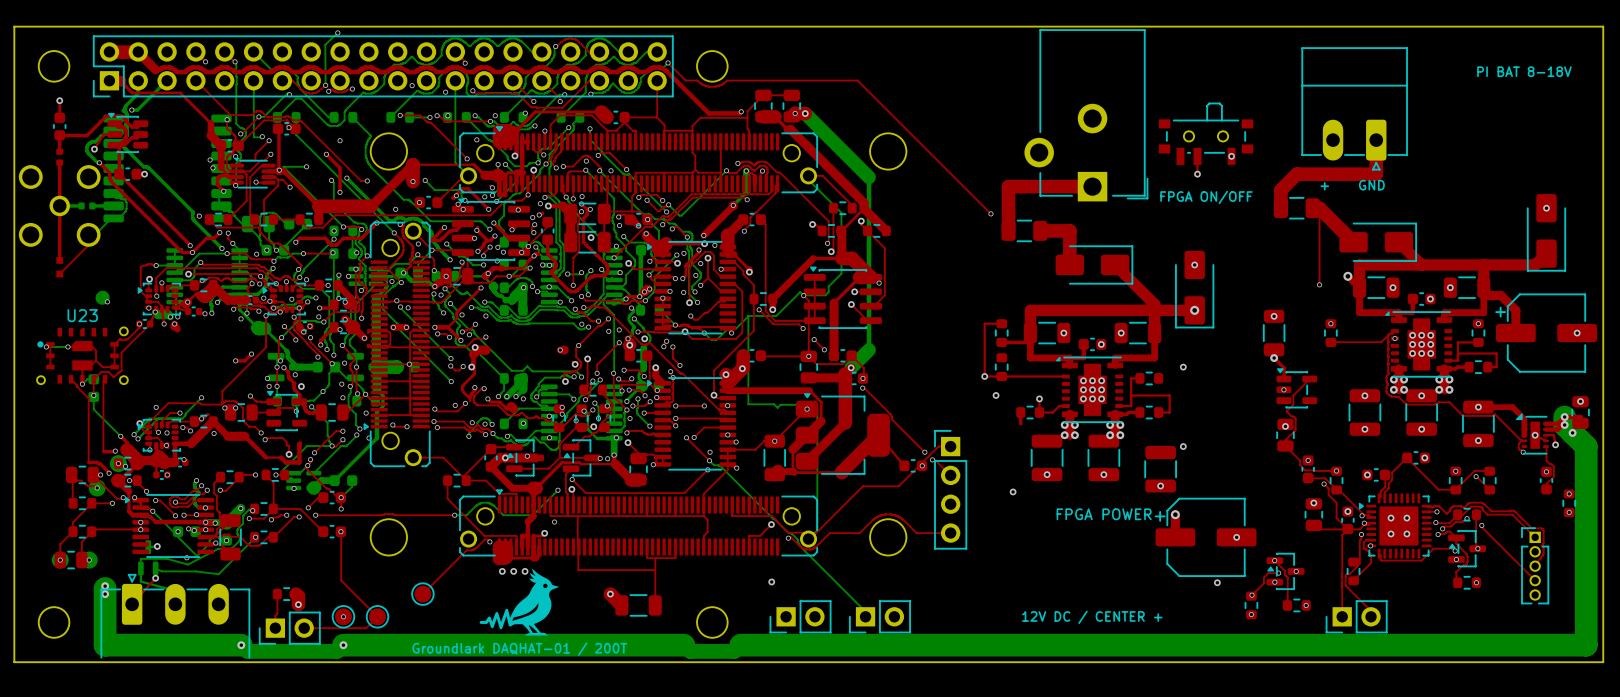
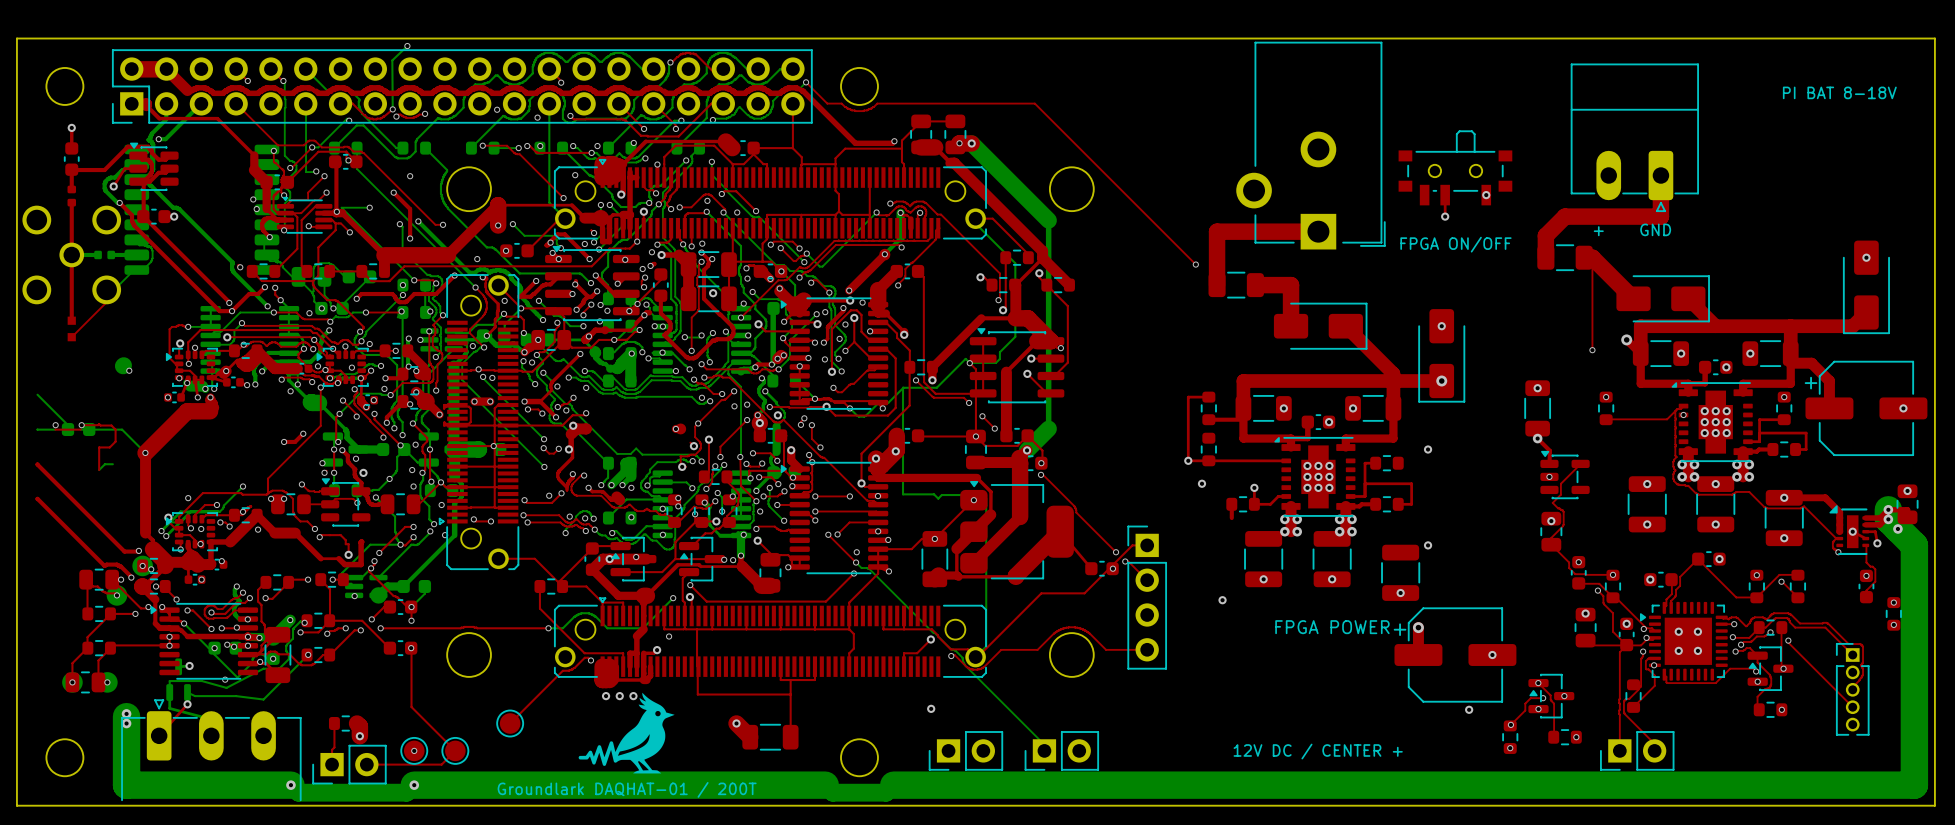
bottom track: none -> (37, 394) (67, 425) (67, 429)
top track: (139, 323) (139, 327) (128, 338) (119, 339) (114, 344) (114, 367) (102, 367) (96, 360) -> none
top track: (150, 323) (121, 352) (121, 370) (119, 372) (113, 376) (108, 371) (101, 371) (93, 379) (93, 395) -> none
top track: none -> (213, 403) (213, 407) (210, 411) (187, 411) (145, 452) (145, 533)
top track: (46, 346) (50, 344) (50, 367) -> none
bottom track: (46, 346) (67, 346) -> none
bottom track: none -> (37, 429) (55, 429)
top track: none -> (55, 429) (80, 429)
bottom track: none -> (80, 429) (122, 429) (145, 452)
U23: (82, 355) -> none
via: none -> (145, 452)
top track: (71, 379) (88, 398) (88, 462) -> (37, 499) (104, 565) (106, 564)
top track: (105, 379) (103, 381) (103, 451) -> (37, 464) (124, 551)
via: (82, 384) -> none
part rotation: 0° (93, 388) -> 90° clockwise (78, 429)
part position: (93, 388) -> (78, 429)
bottom track: (93, 395) (93, 409) (120, 436) -> none
via: (93, 395) -> none
via: (120, 436) -> none

